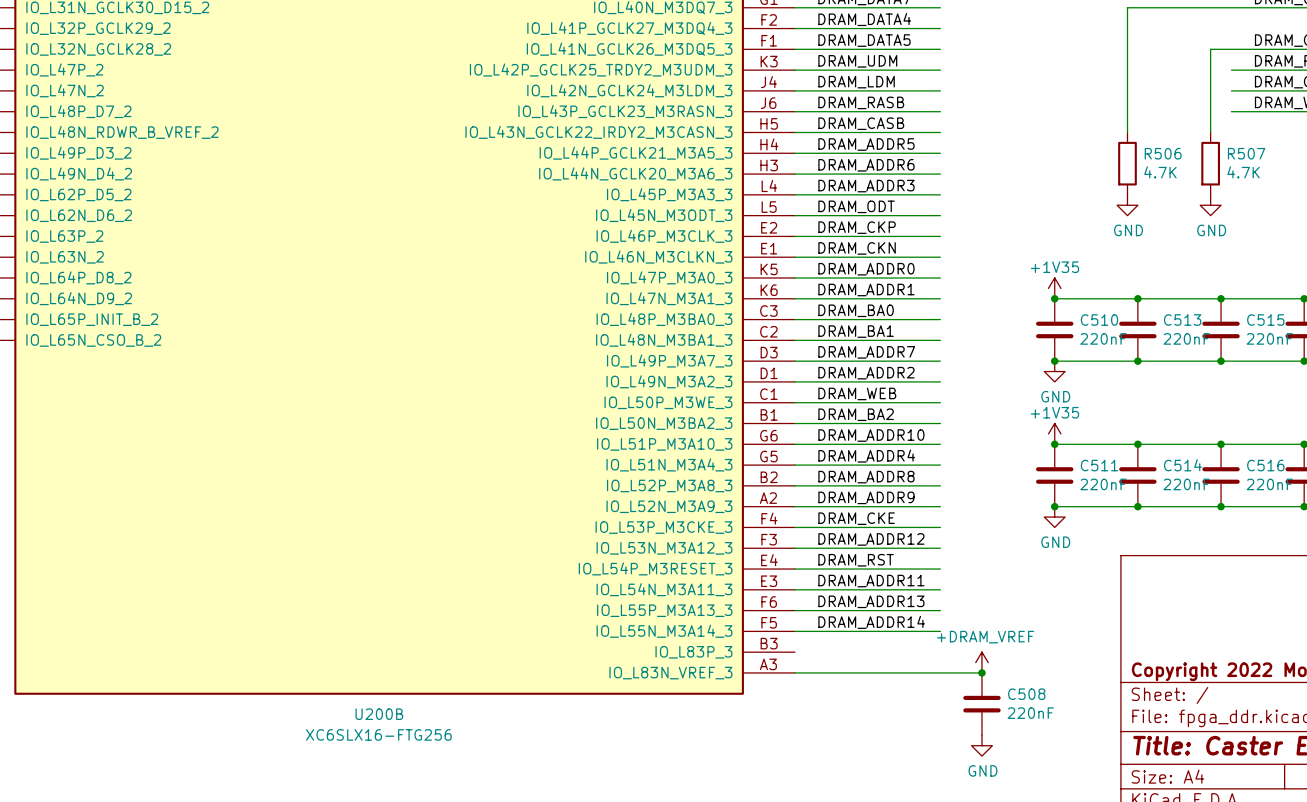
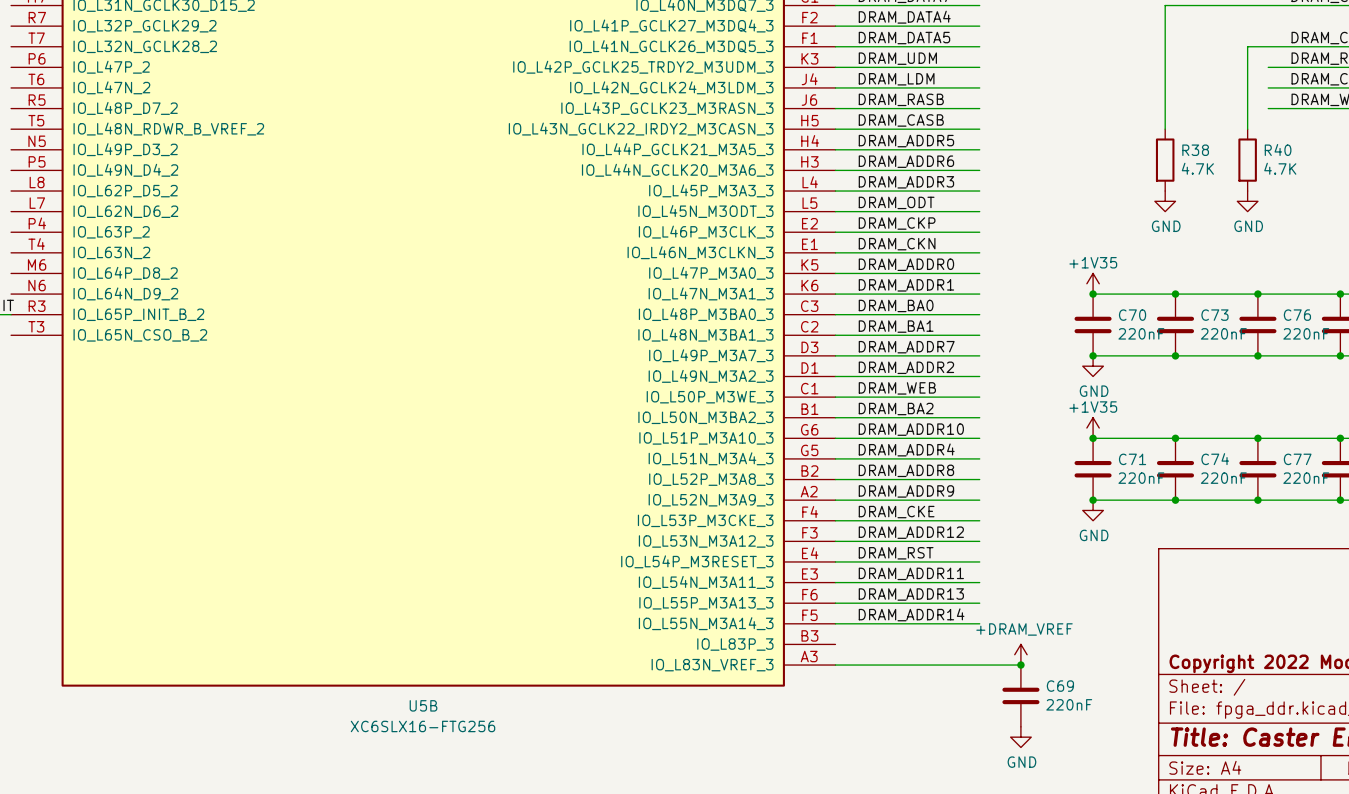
R506 name: R506 (1163, 153) -> R38 (1195, 150)
R507 name: R507 (1246, 153) -> R40 (1278, 149)
C510 name: C510 (1099, 320) -> C70 (1132, 315)
C513 name: C513 (1182, 320) -> C73 (1214, 315)
C515 name: C515 (1265, 320) -> C76 (1297, 315)
C511 name: C511 (1099, 465) -> C71 (1132, 459)
C514 name: C514 (1182, 465) -> C74 (1215, 459)
C516 name: C516 (1265, 465) -> C77 (1297, 459)
C508 name: C508 (1026, 694) -> C69 (1060, 686)
U200B name: U200B (379, 714) -> U5B (423, 705)

